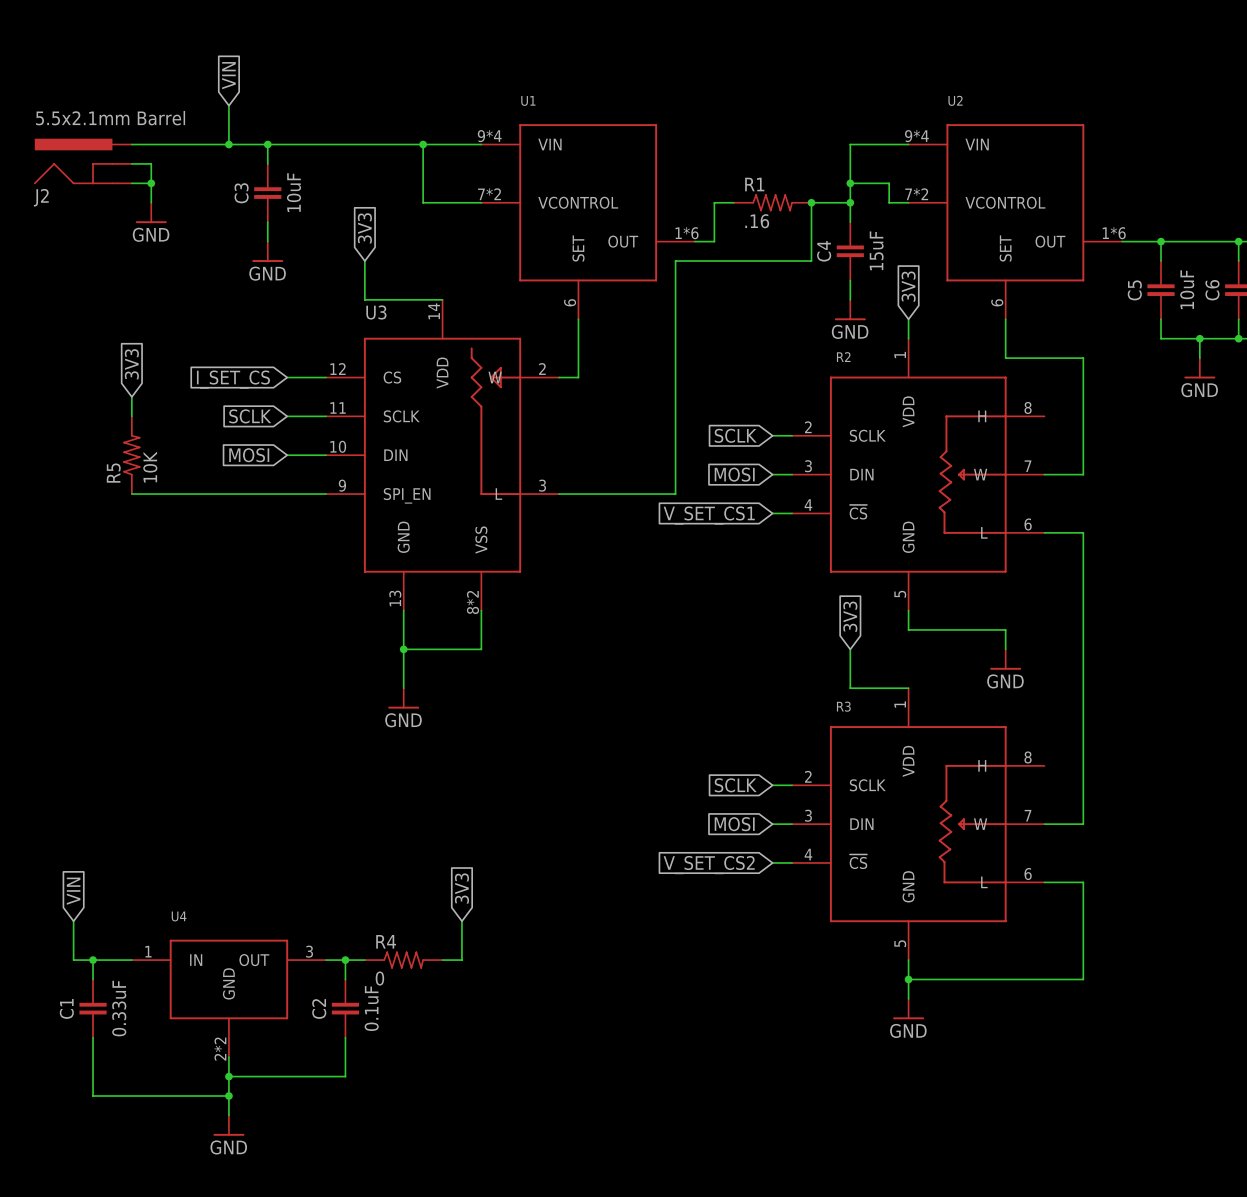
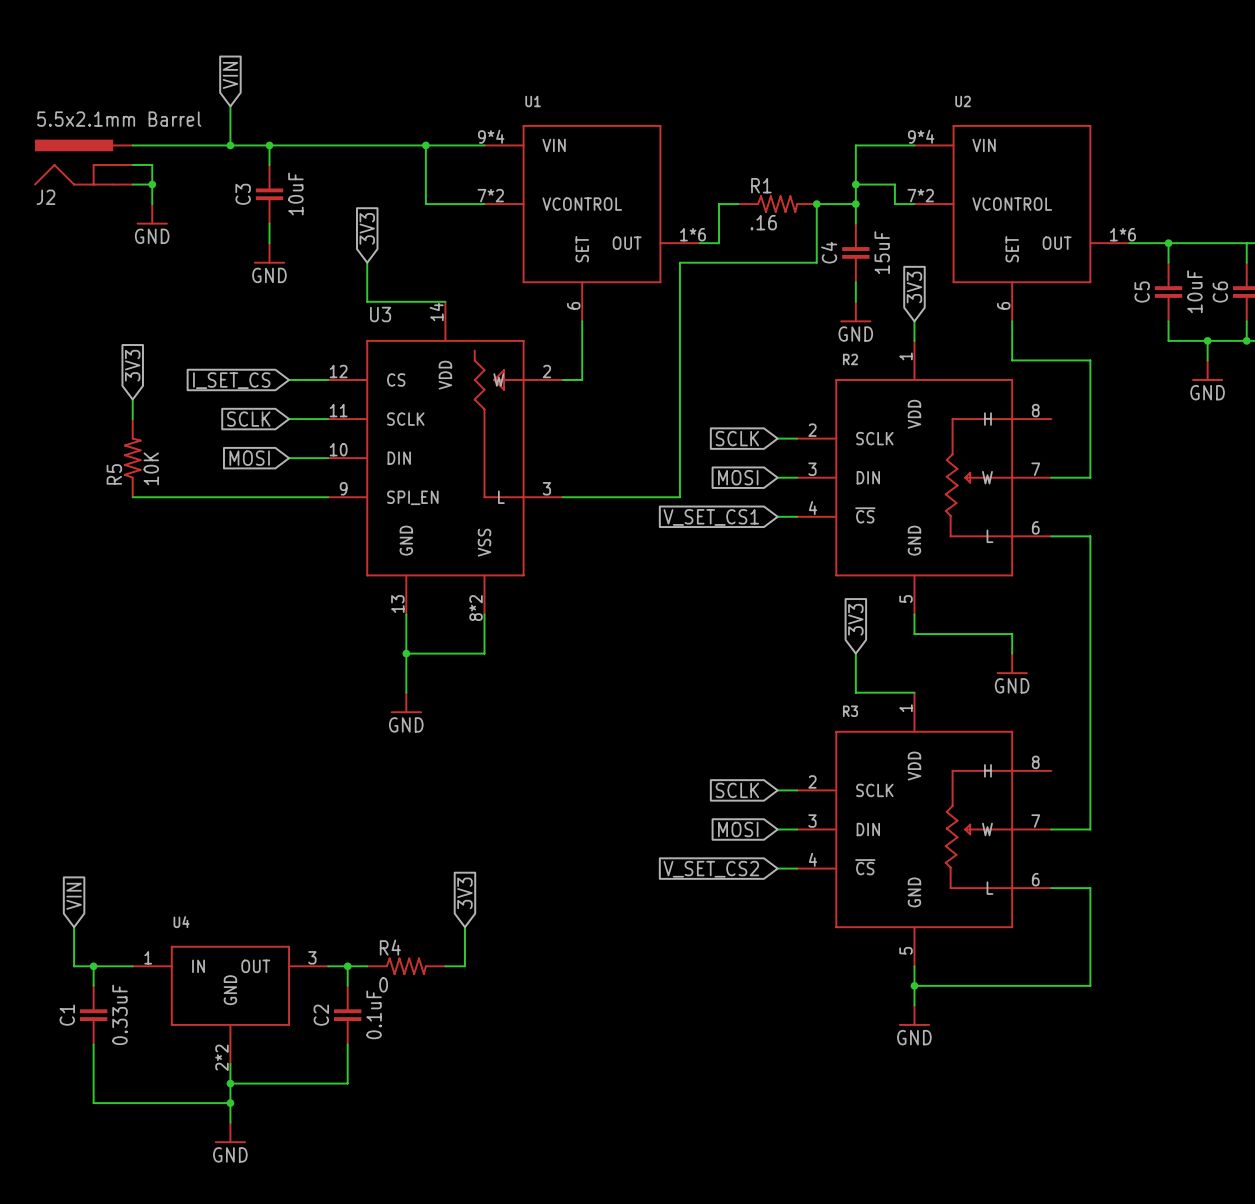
junction: (1238, 241) -> none

